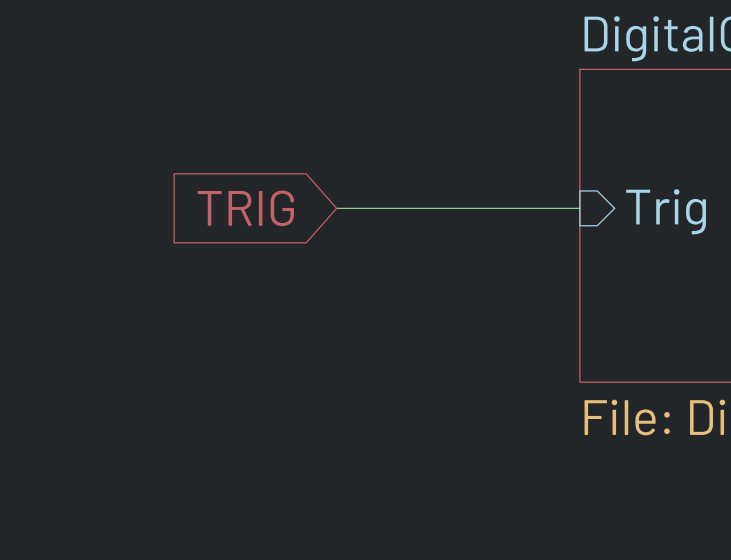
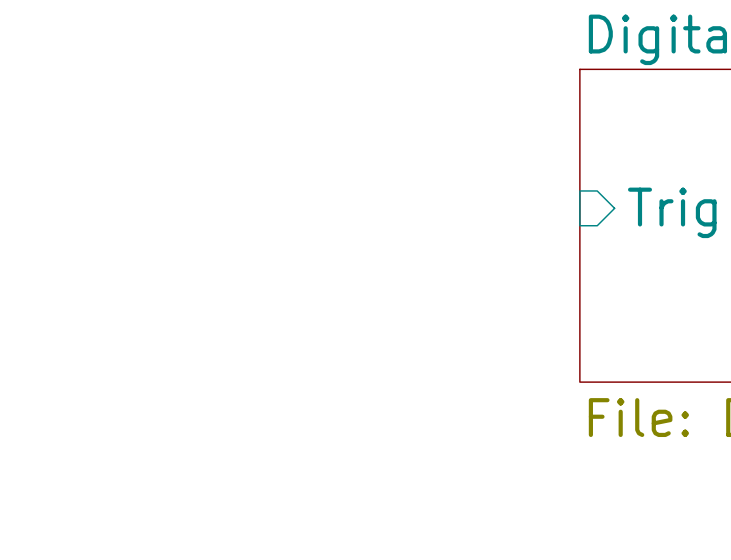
global label: TRIG (245, 208) -> none
wire: (336, 208) (579, 208) -> none

